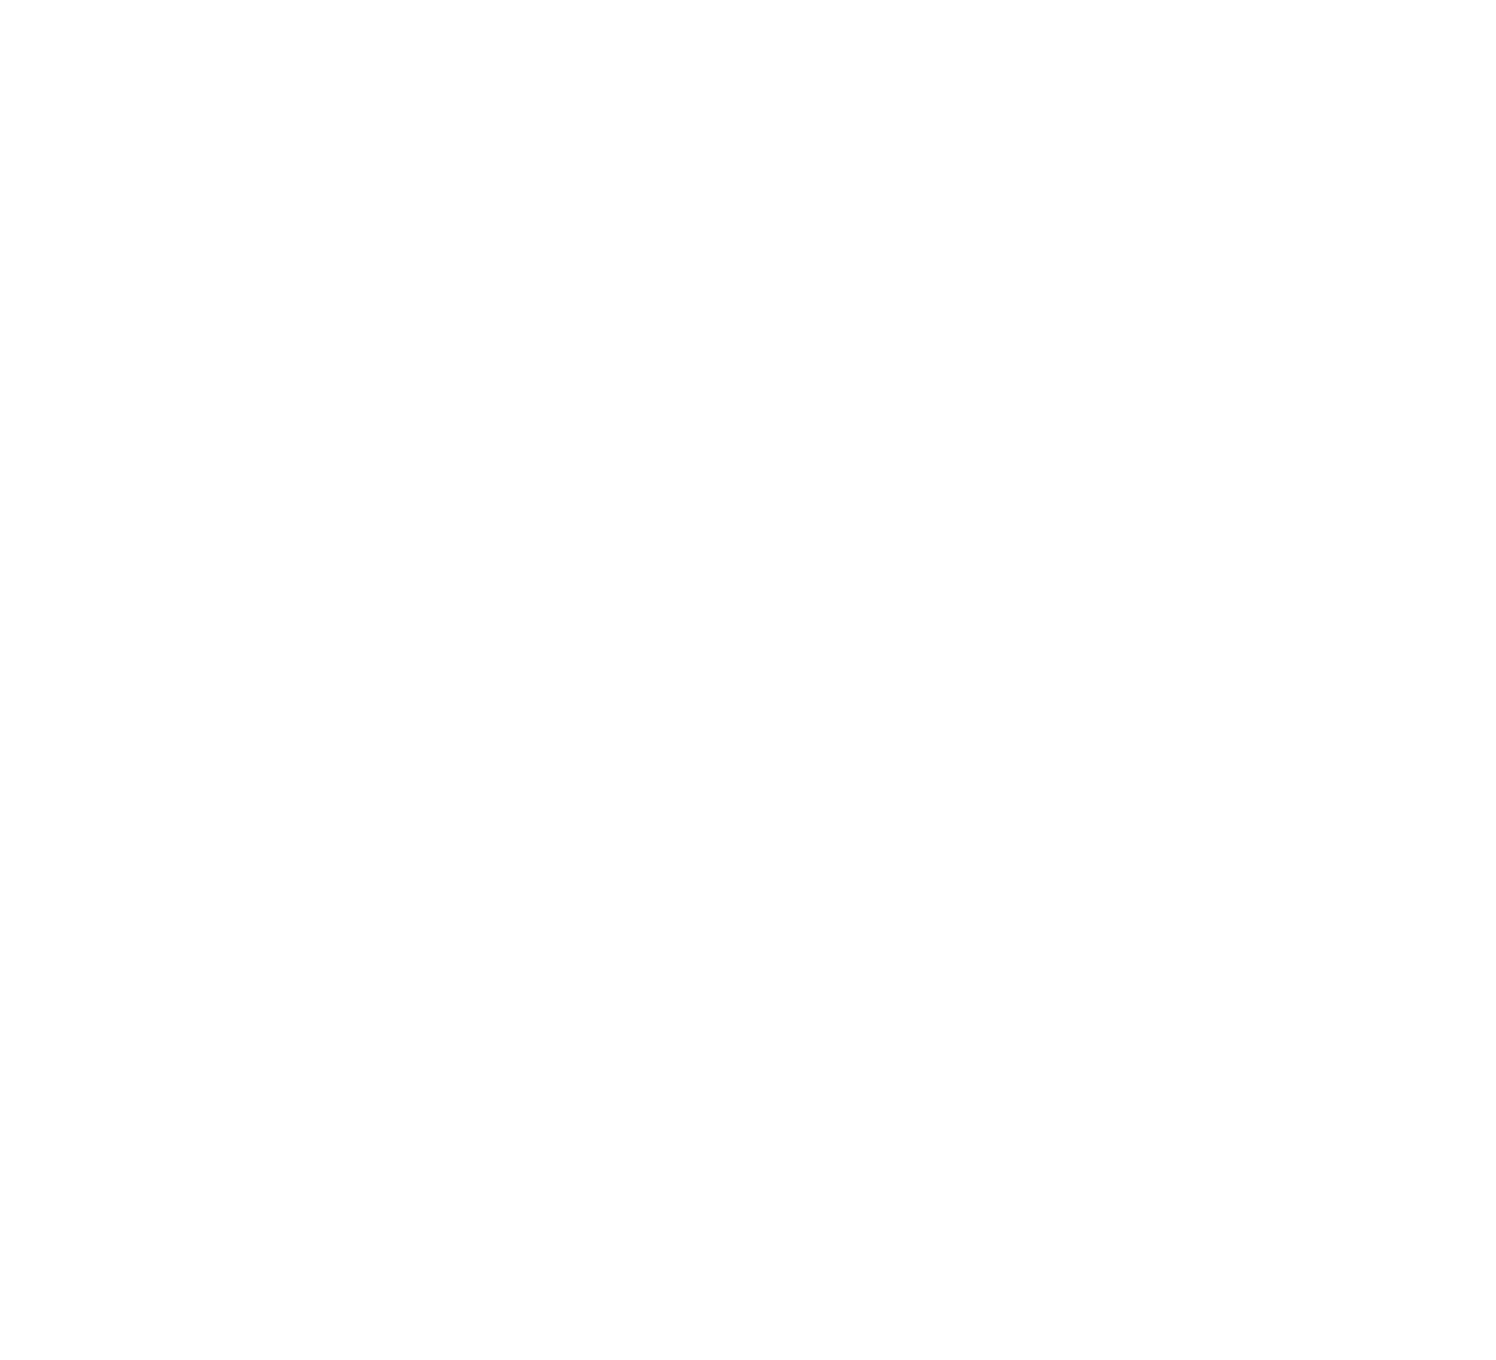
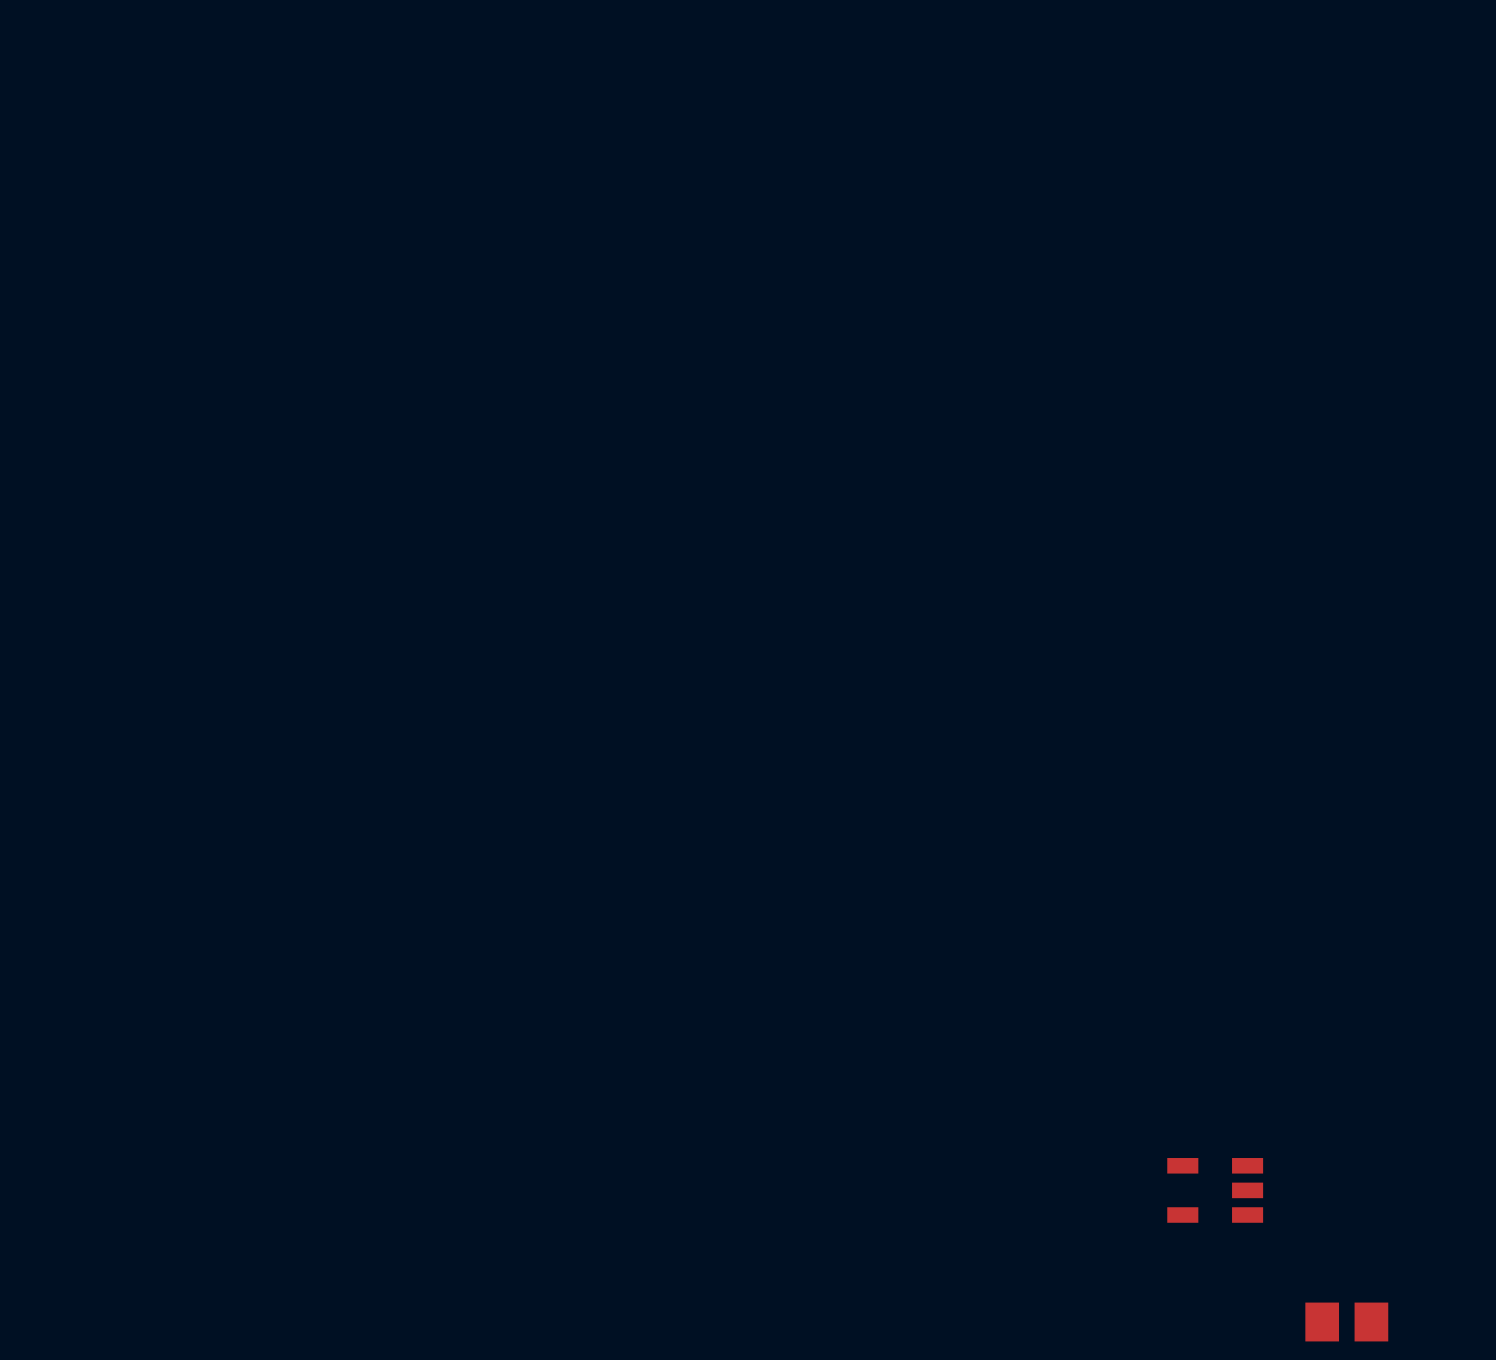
part: none -> (1215, 1190)
part: none -> (1346, 1322)

